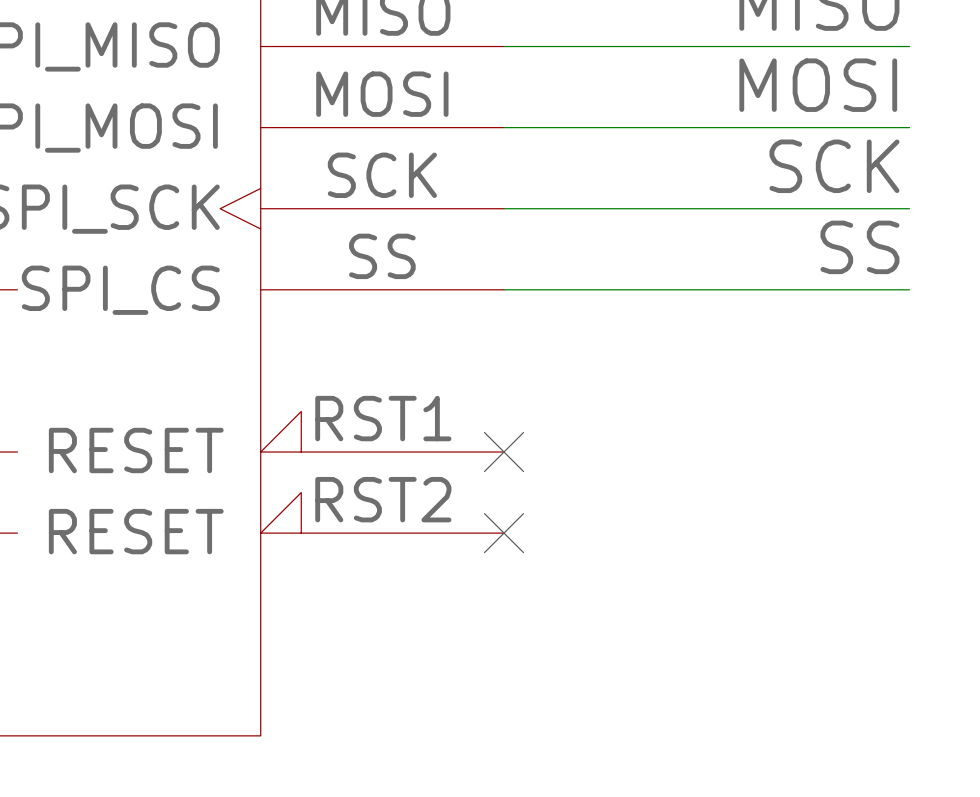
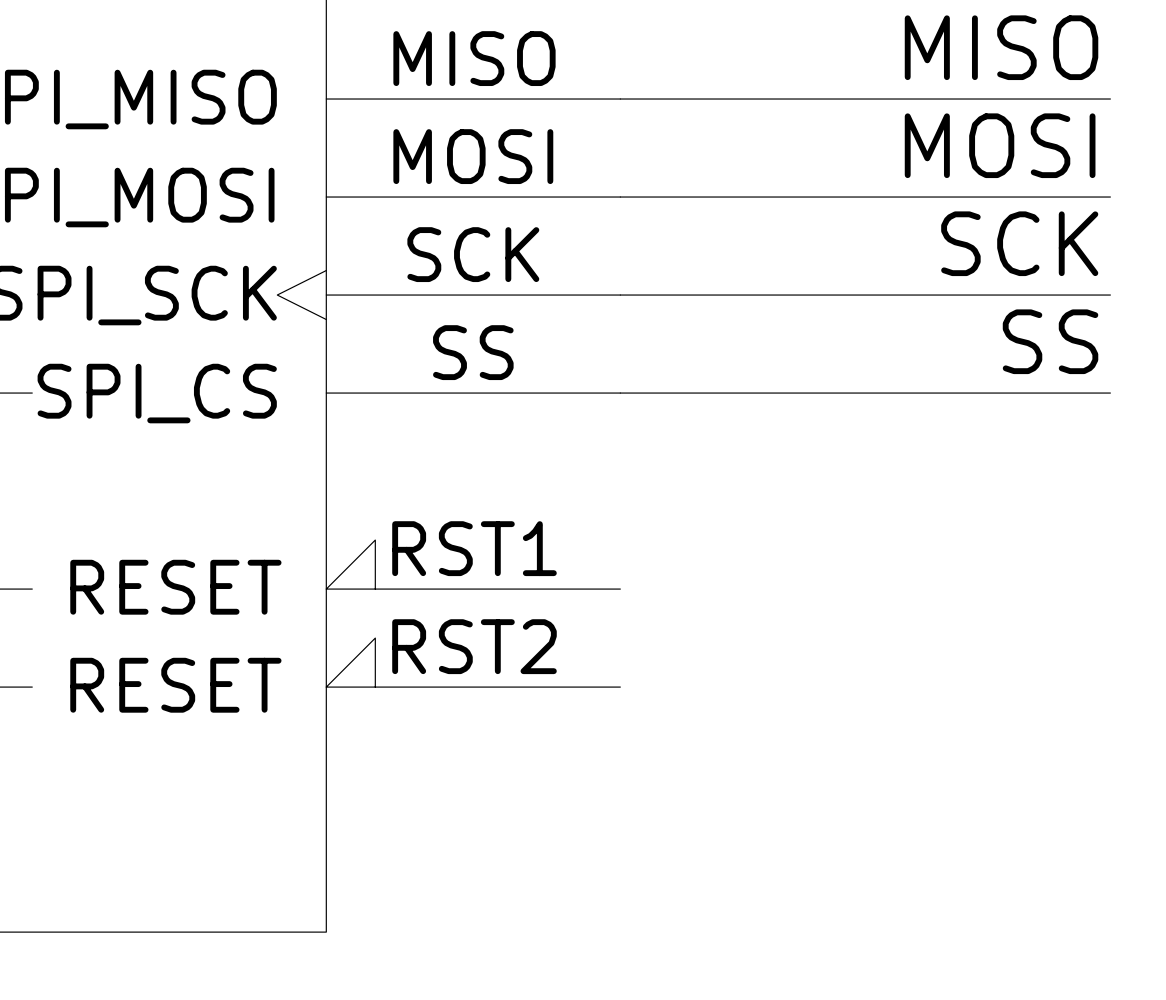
no-connect mark: (504, 452) -> none
no-connect mark: (504, 533) -> none

